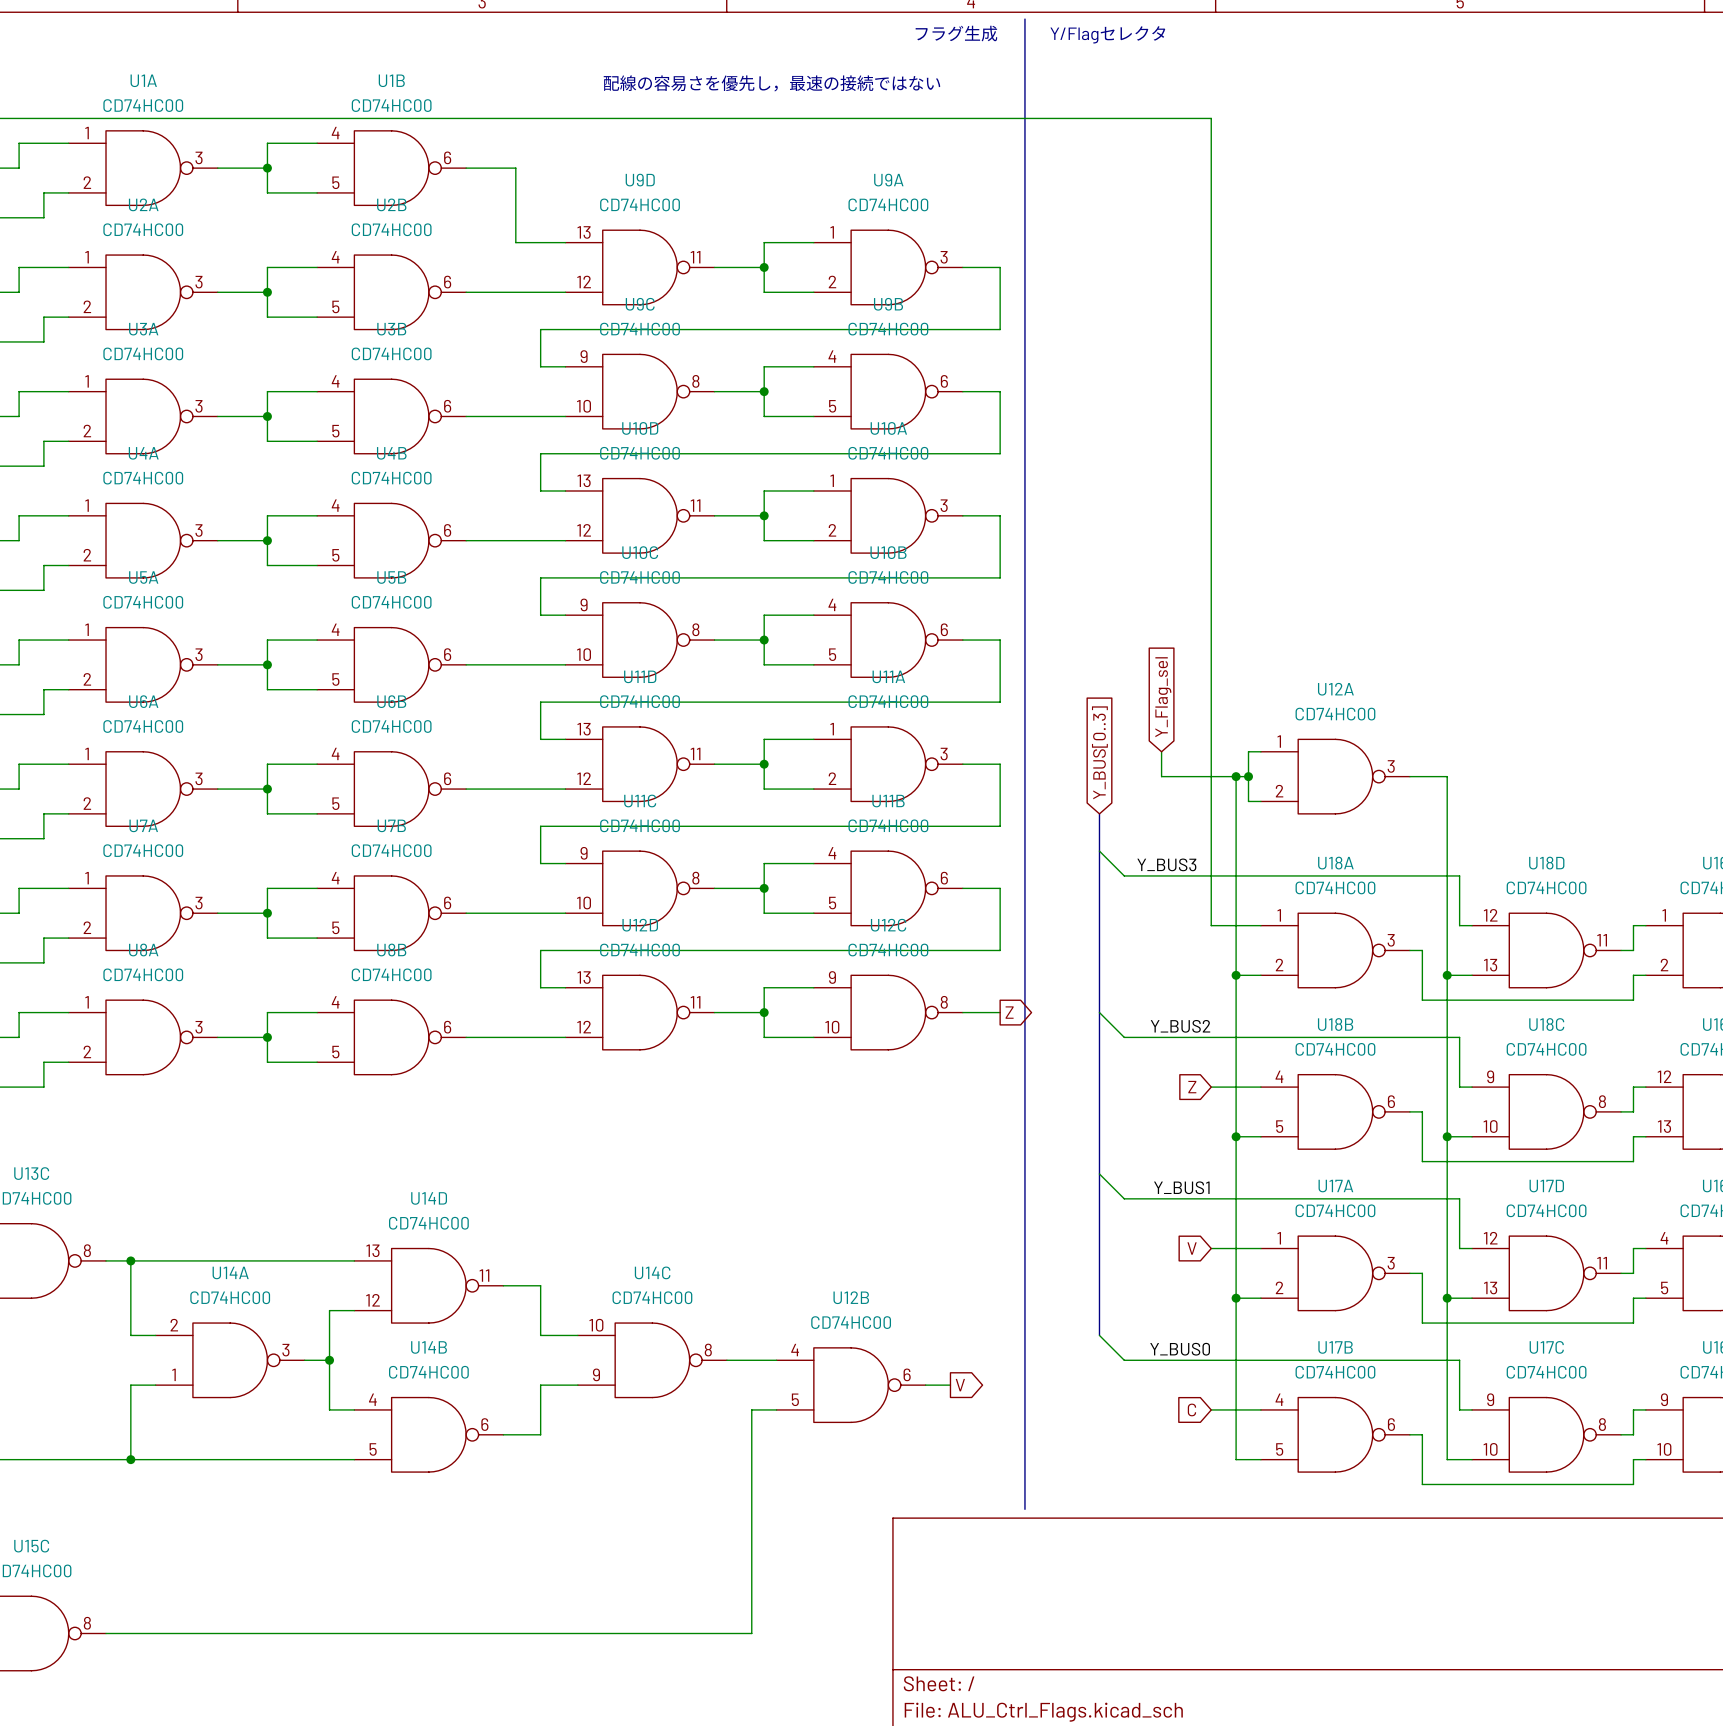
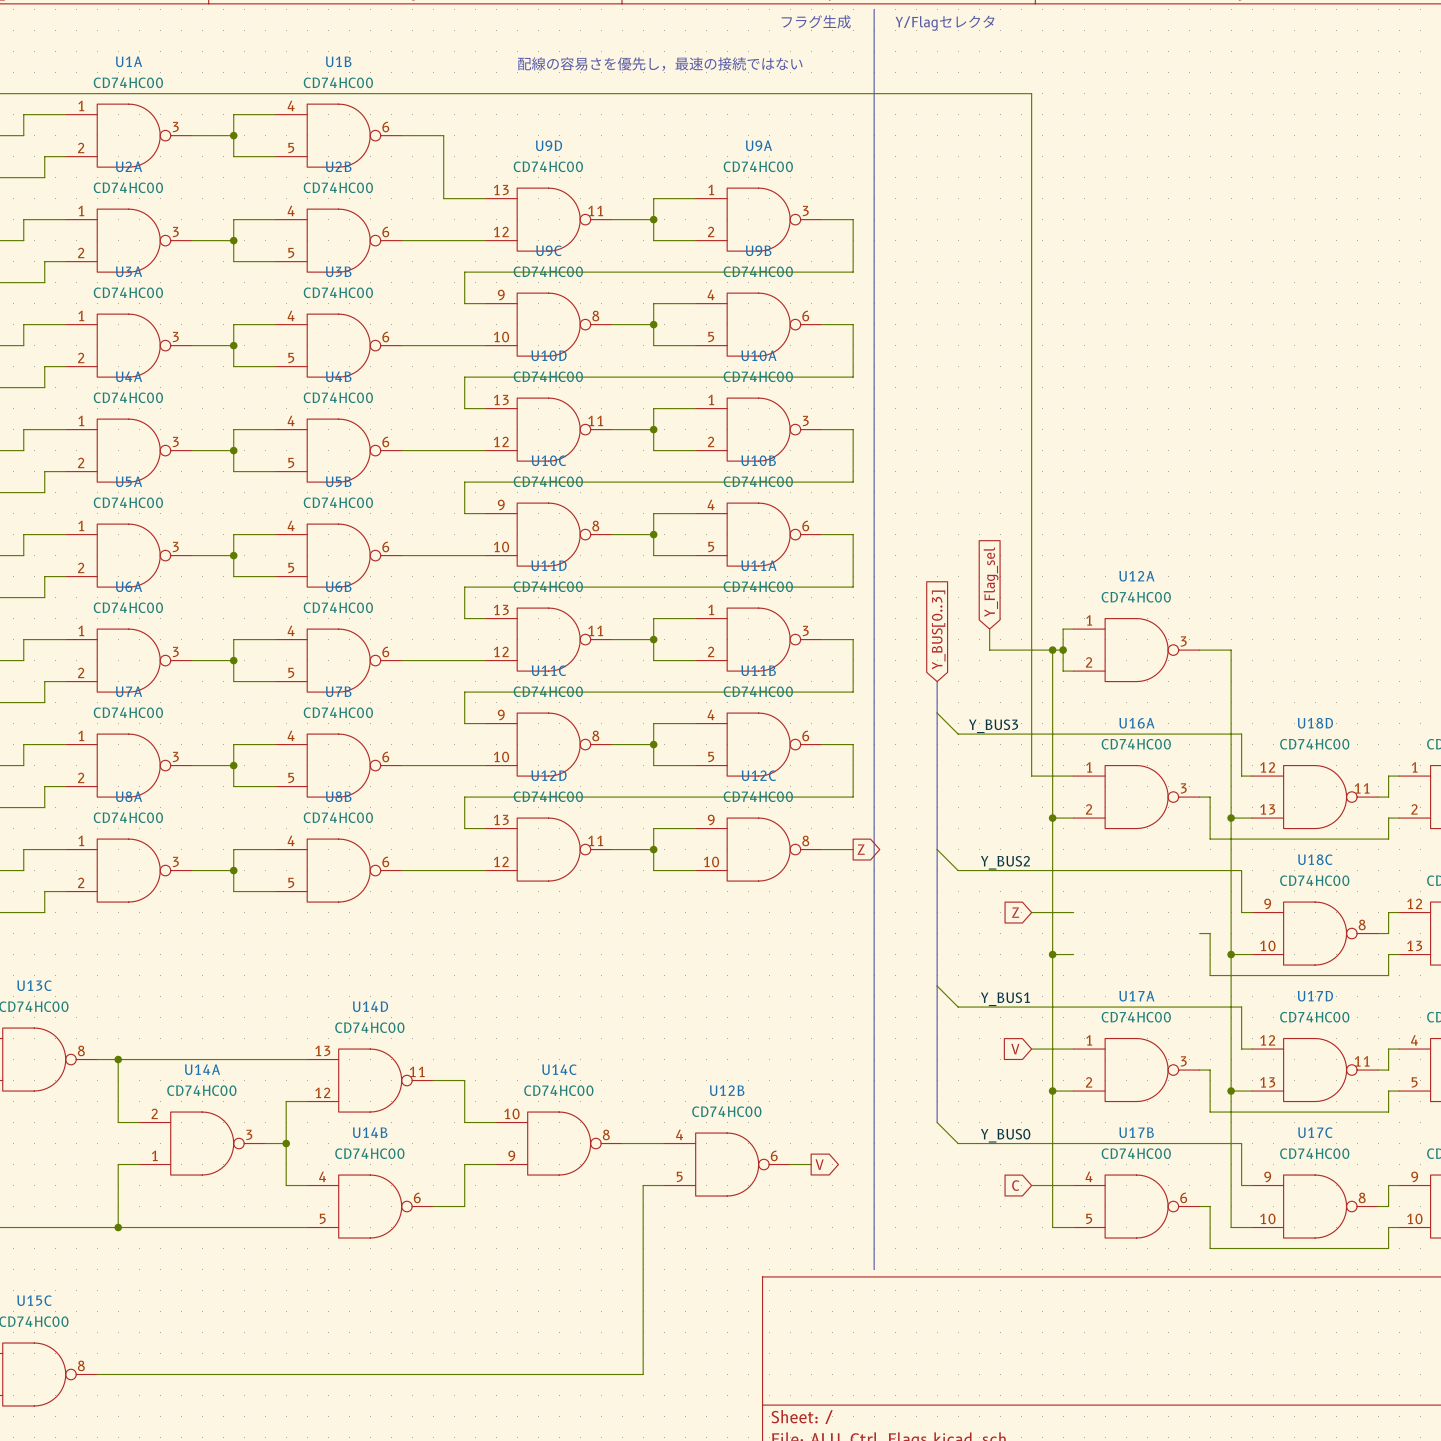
U18A name: U18A (1335, 863) -> U16A (1136, 723)
U18B: CD74HC00 (1335, 1111) -> none

